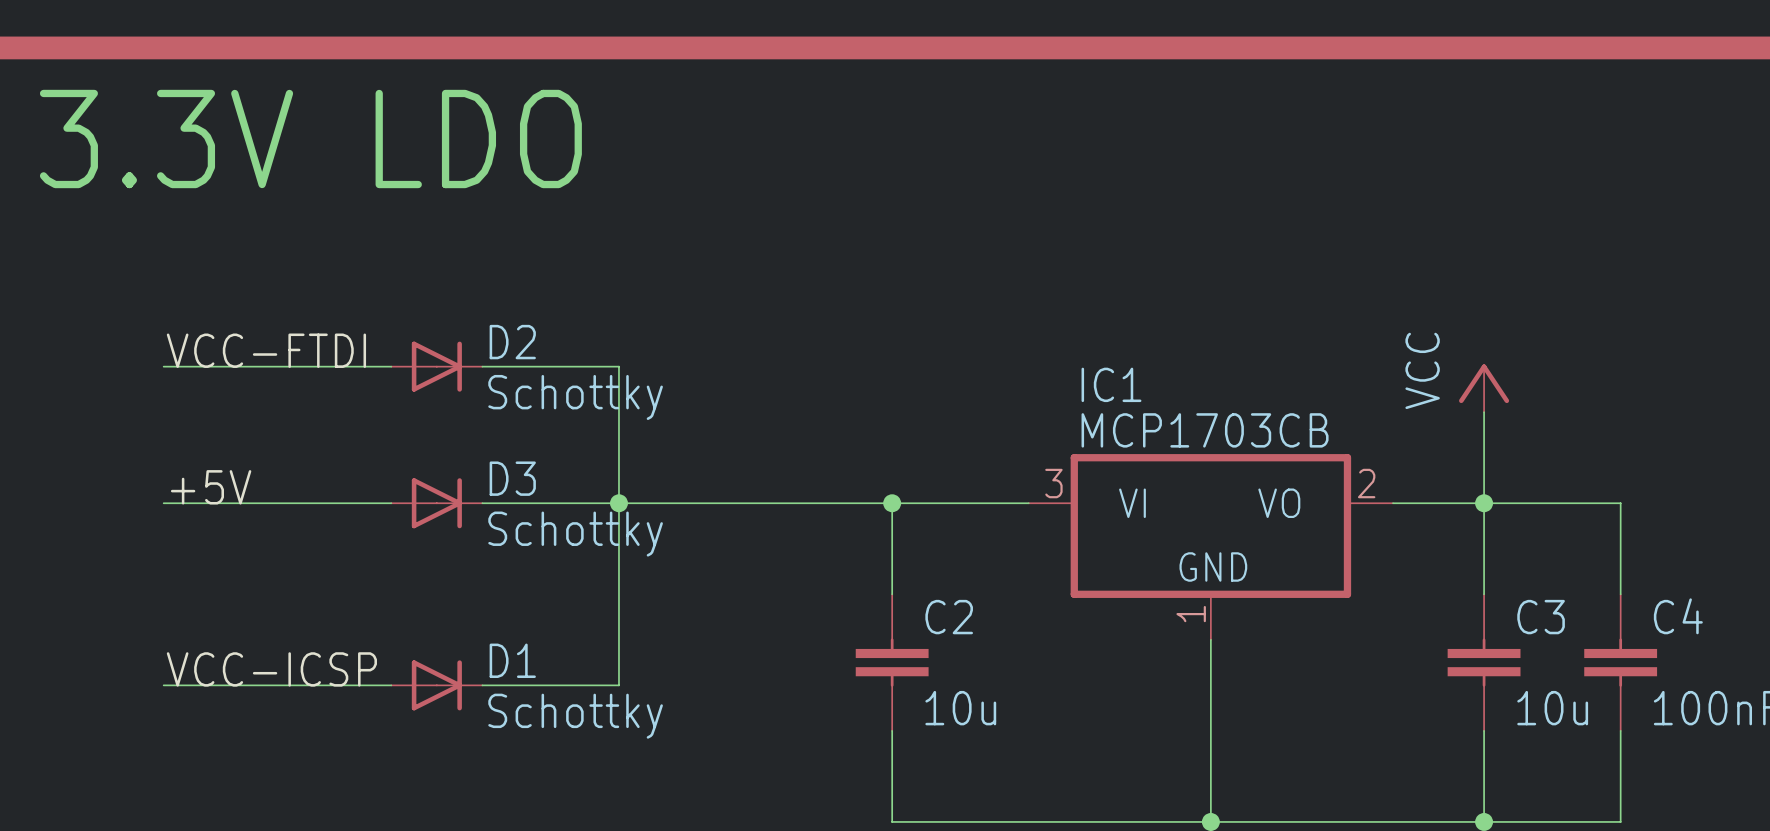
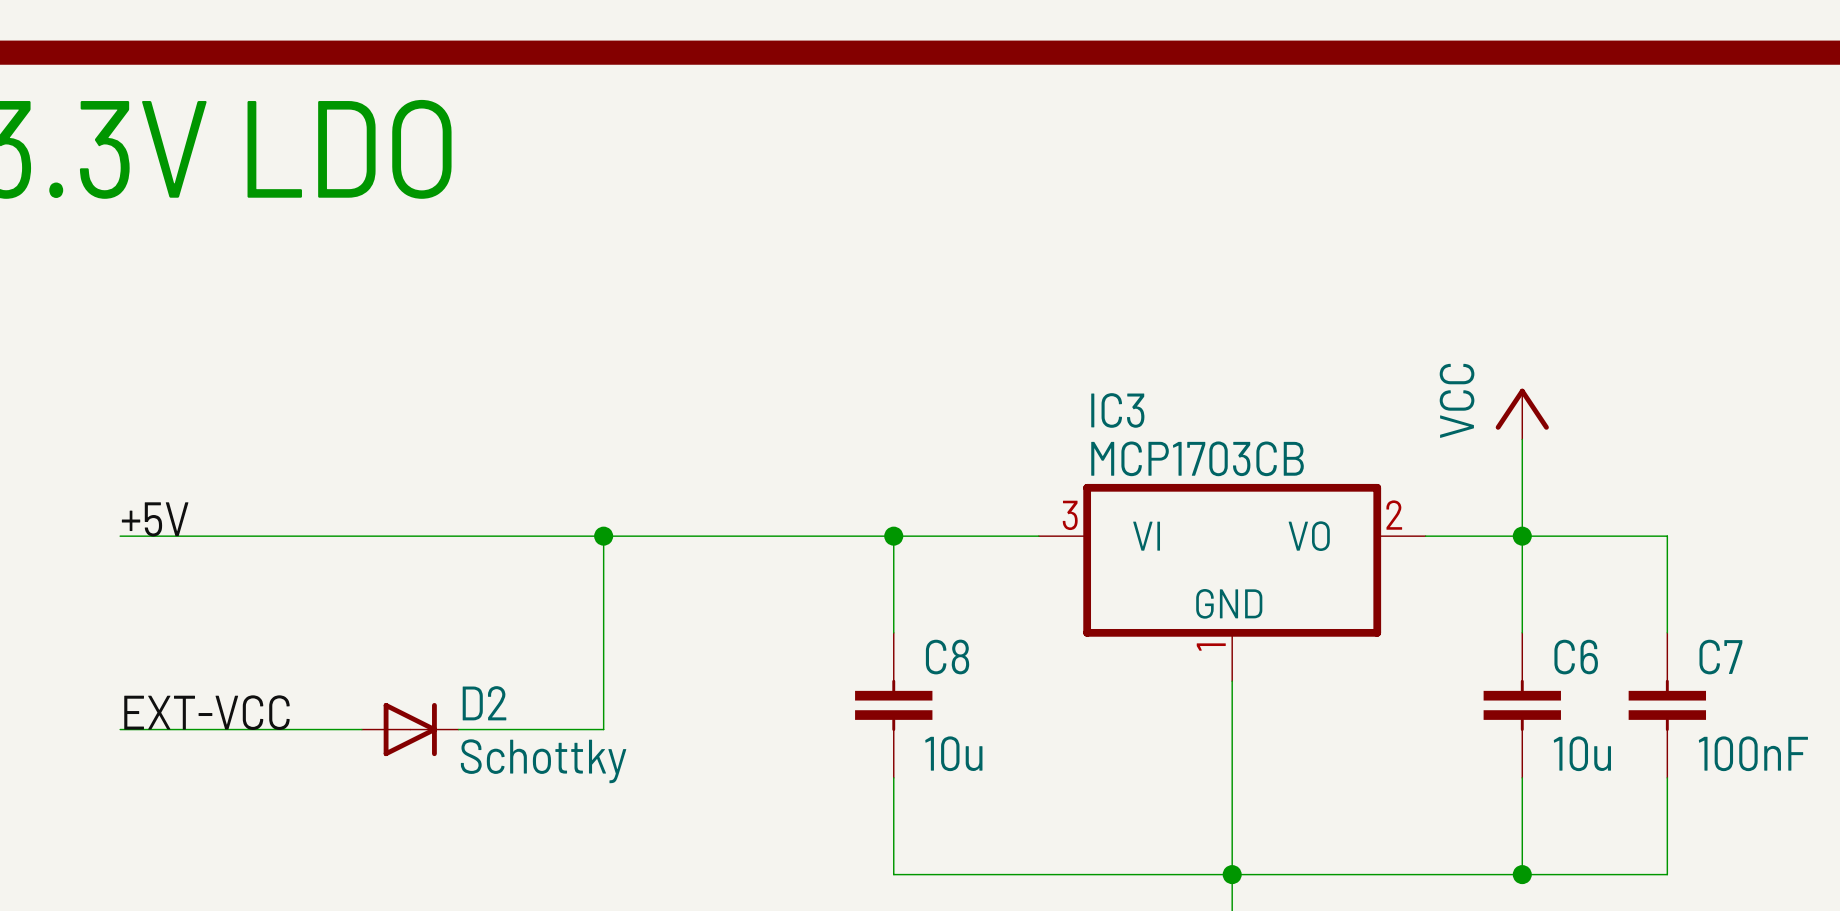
label: VCC-FTDI (266, 350) -> none
wire: (163, 366) (391, 366) -> none
D2: Schottky (436, 366) -> none
wire: (482, 366) (618, 366) (618, 503) -> none
IC1 name: IC1 (1111, 384) -> IC3 (1117, 410)
D3: Schottky (436, 503) -> none
C4 name: C4 (1678, 616) -> C7 (1720, 657)
C2 name: C2 (949, 617) -> C8 (947, 657)
C3 name: C3 (1541, 617) -> C6 (1576, 657)
D1 name: D1 (512, 660) -> D2 (484, 703)
label: VCC-ICSP (271, 669) -> EXT-VCC (206, 712)

